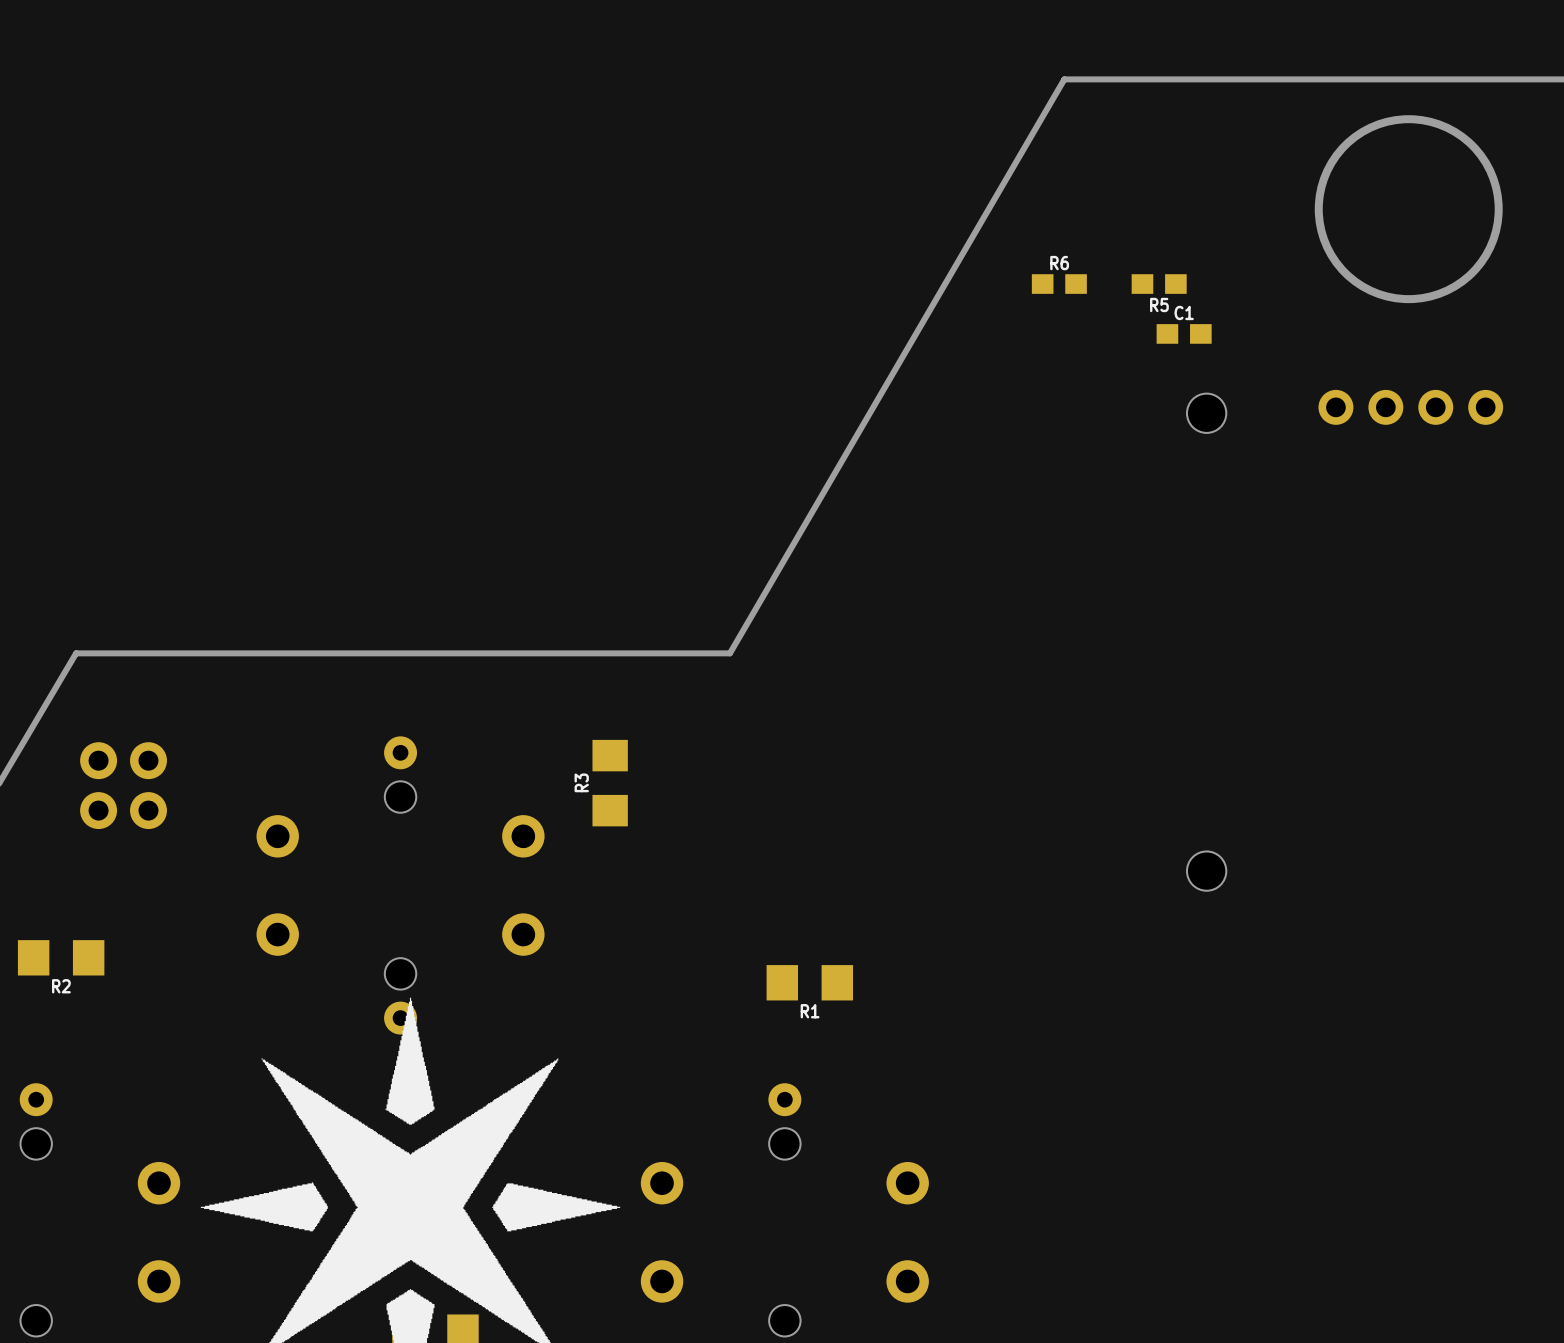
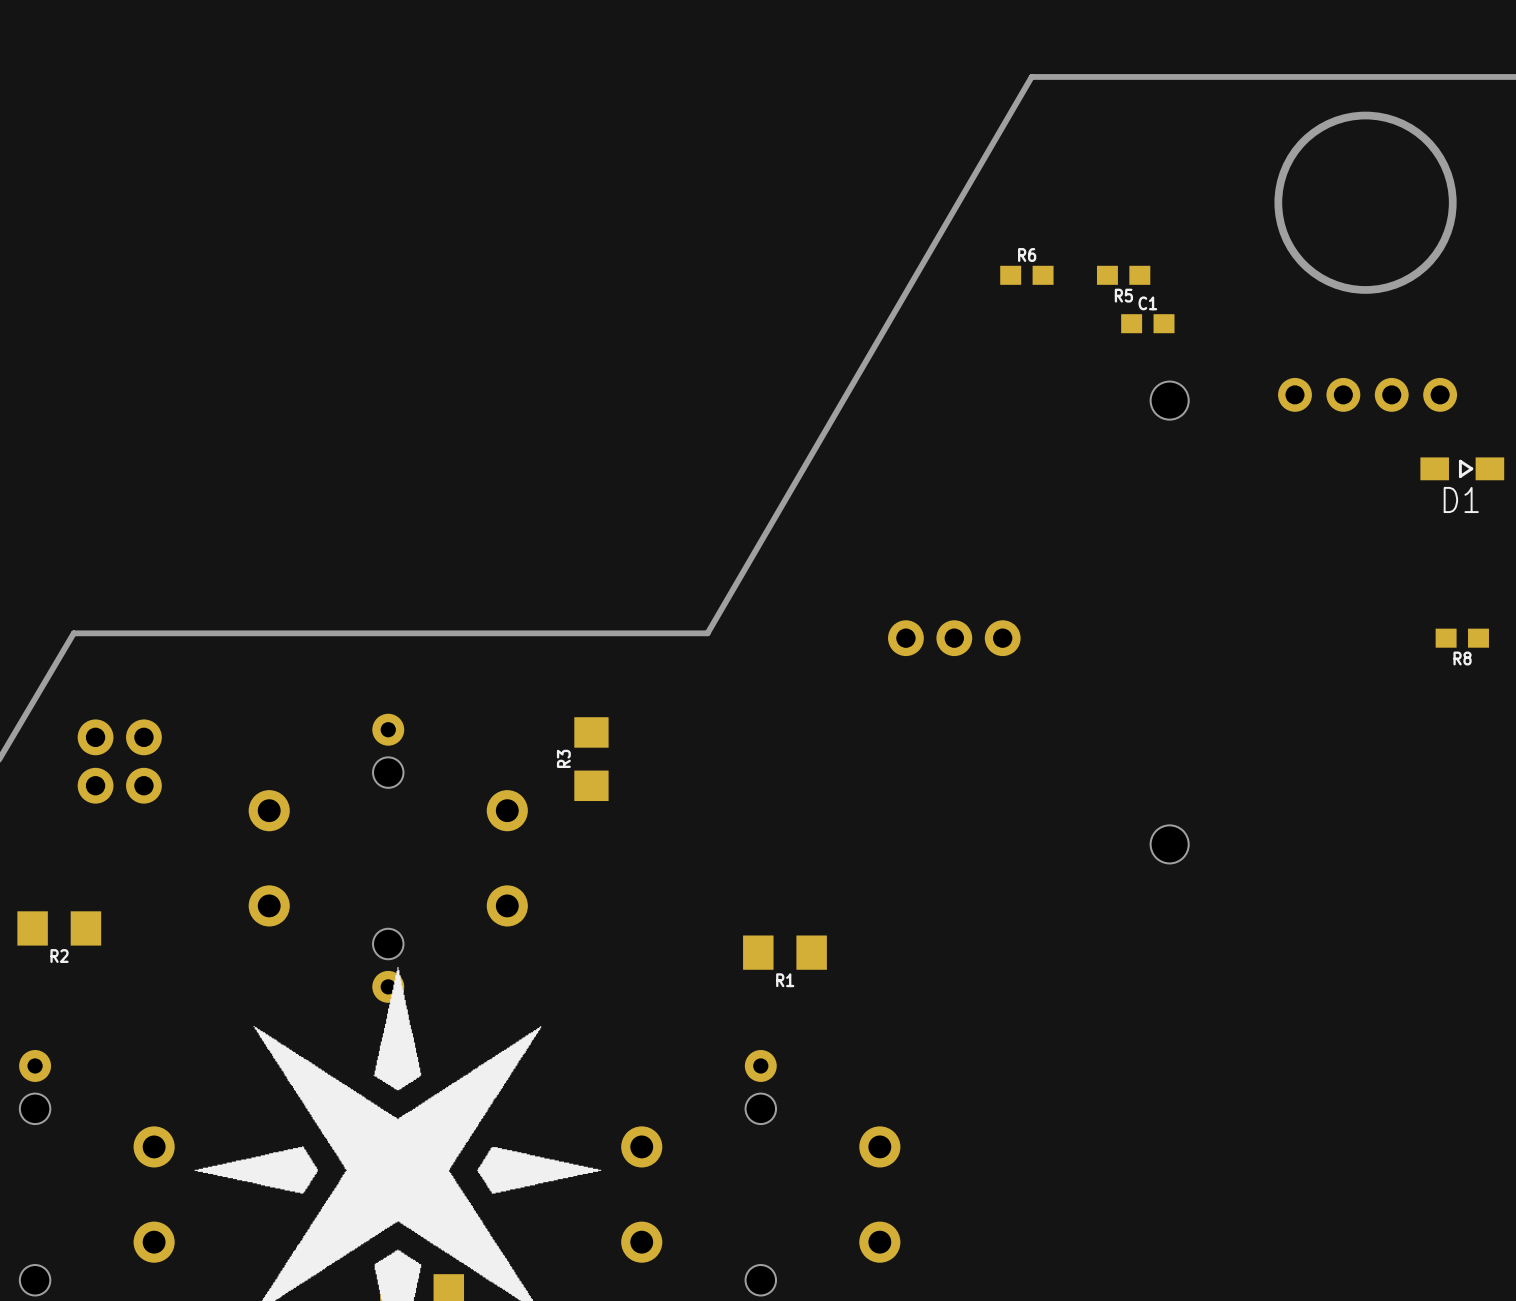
D1: none -> (1462, 468)
part: none -> (954, 638)
R8: none -> (1462, 638)

